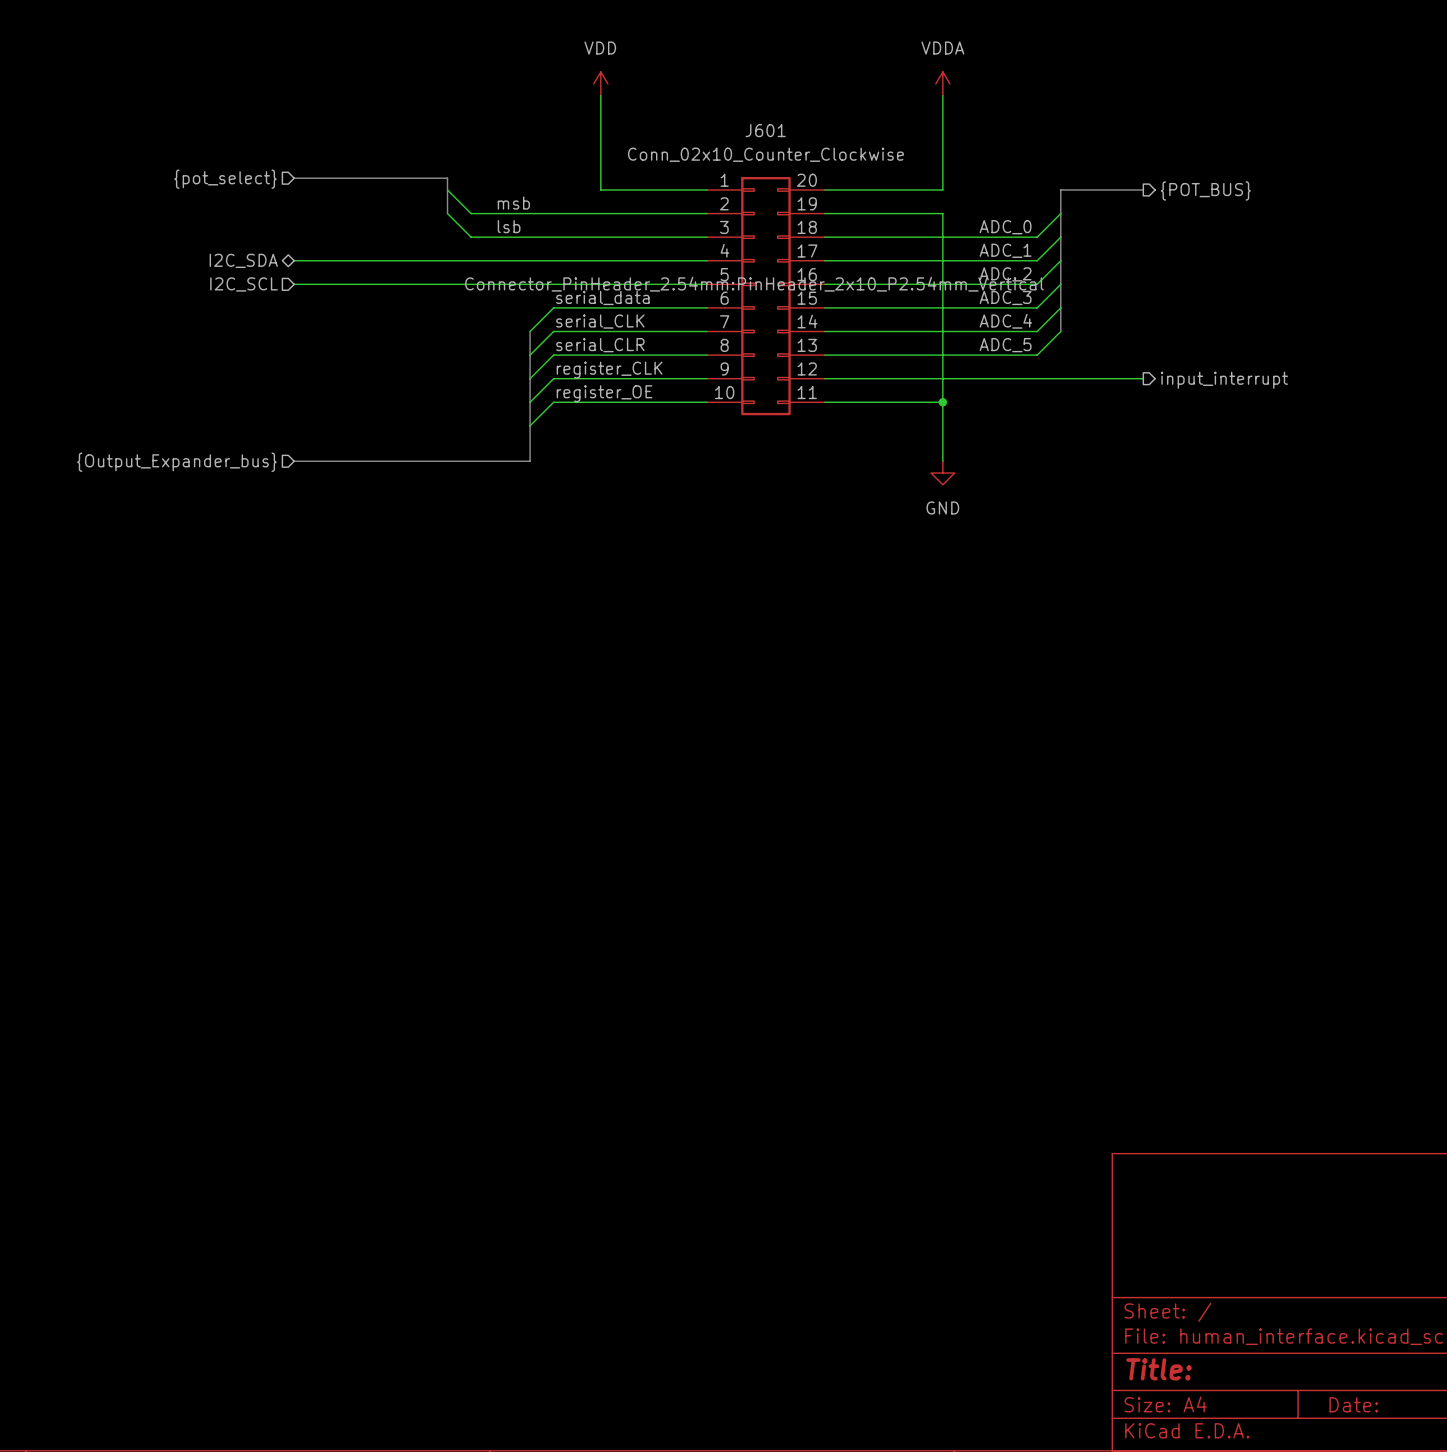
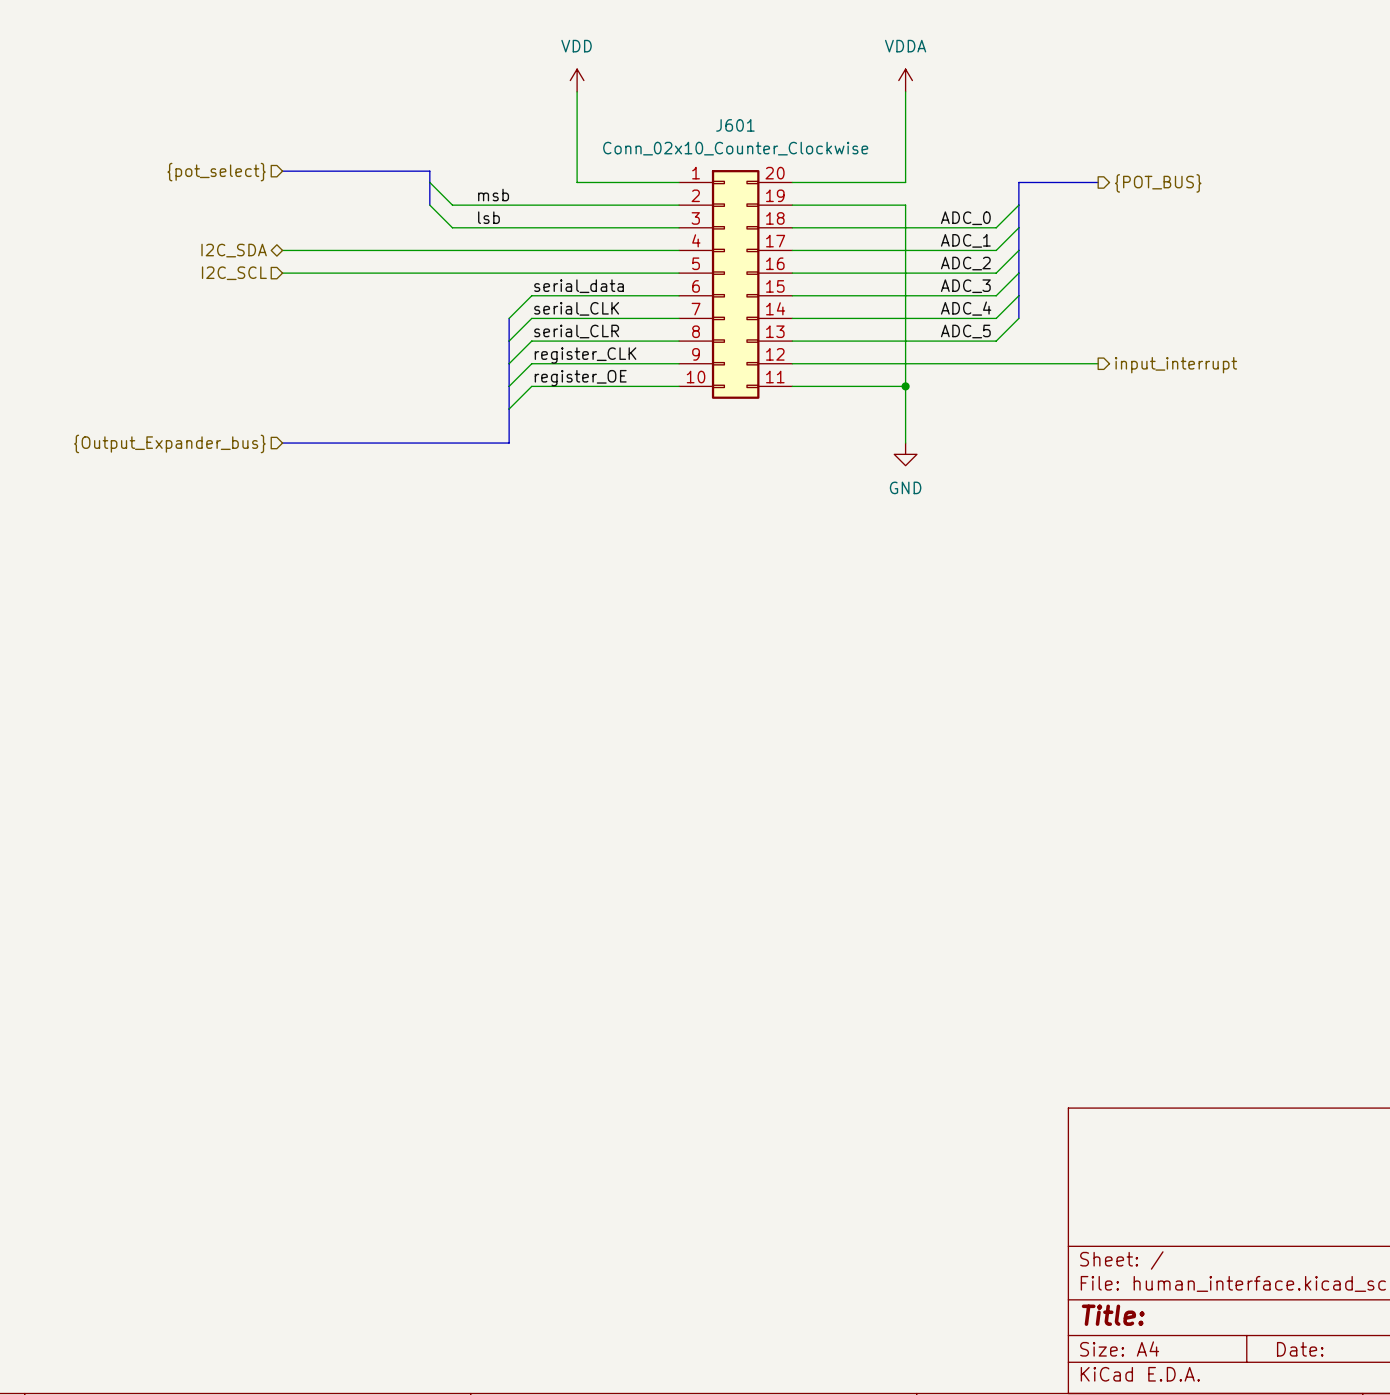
J601 text: Connector_PinHeader_2.54mm:PinHeader_2x10_P2.54mm_Vertical (754, 284) -> none

